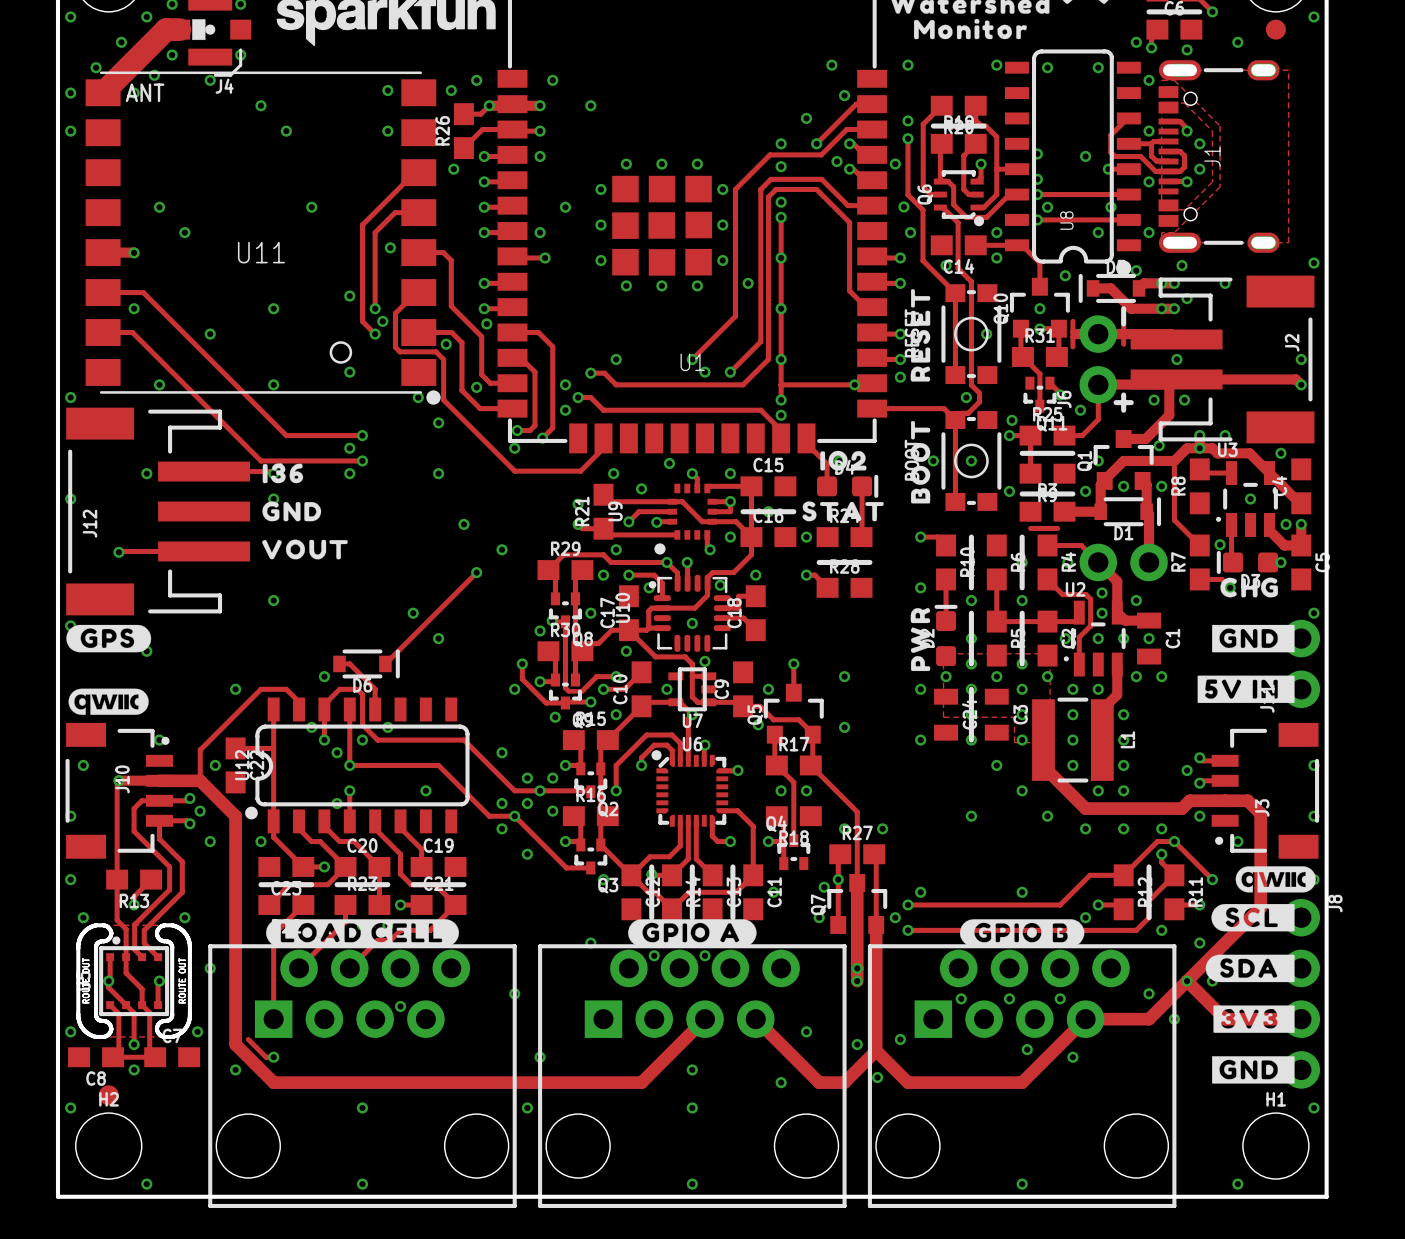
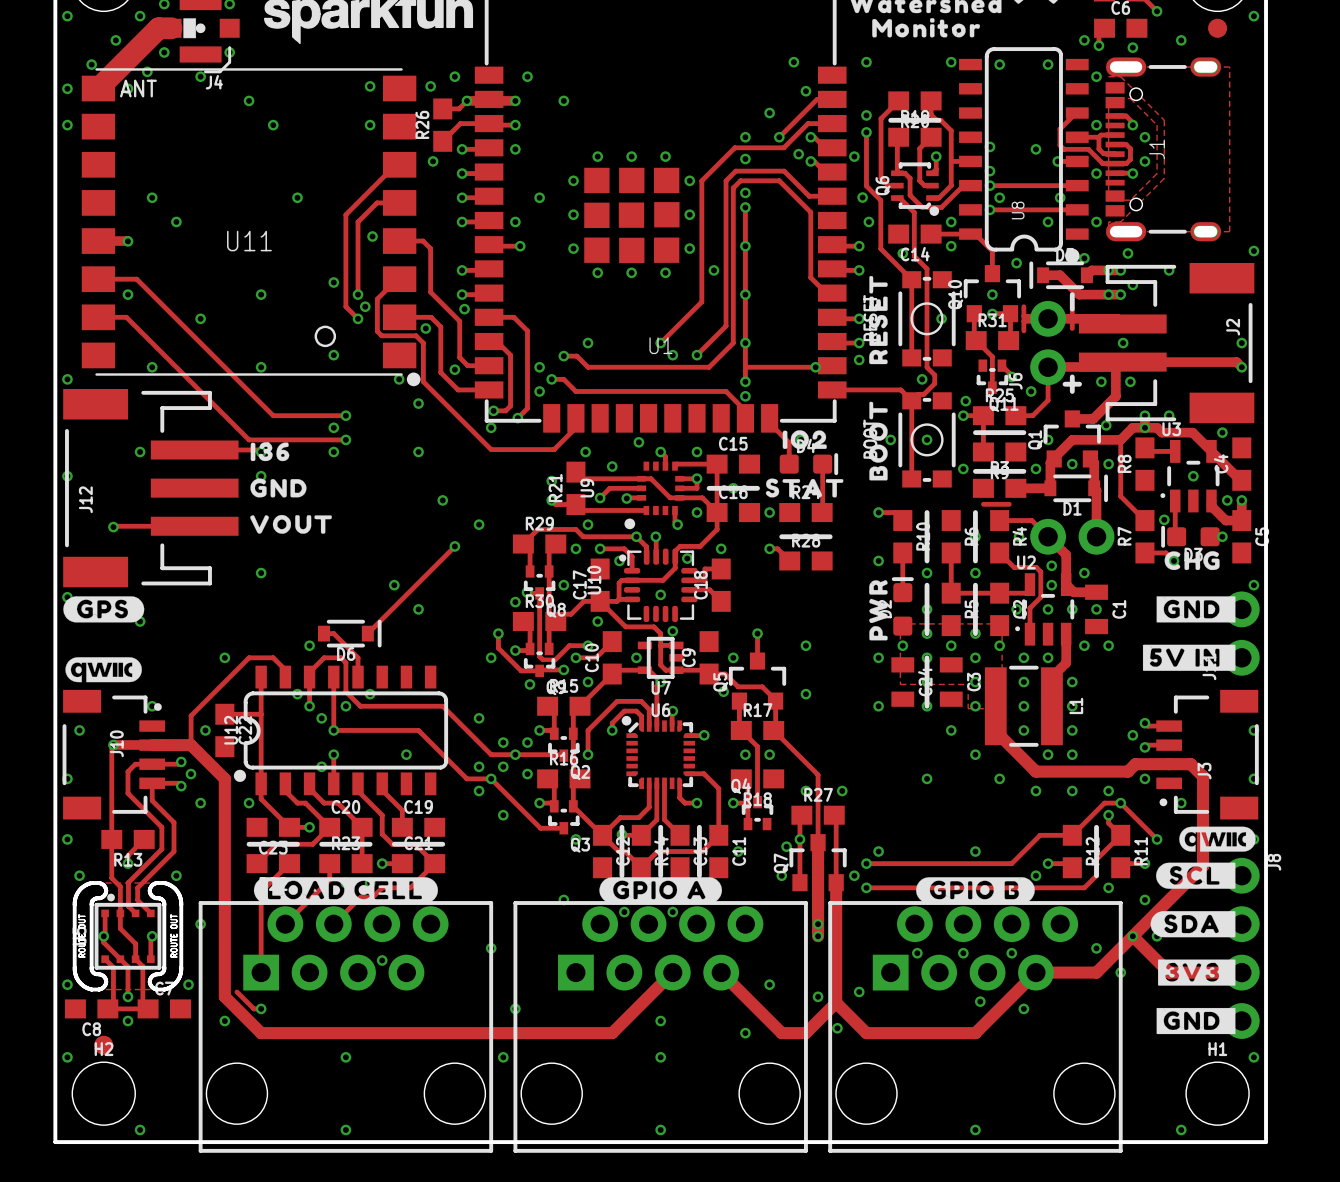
line: (1149, 11) (1199, 11) -> none

